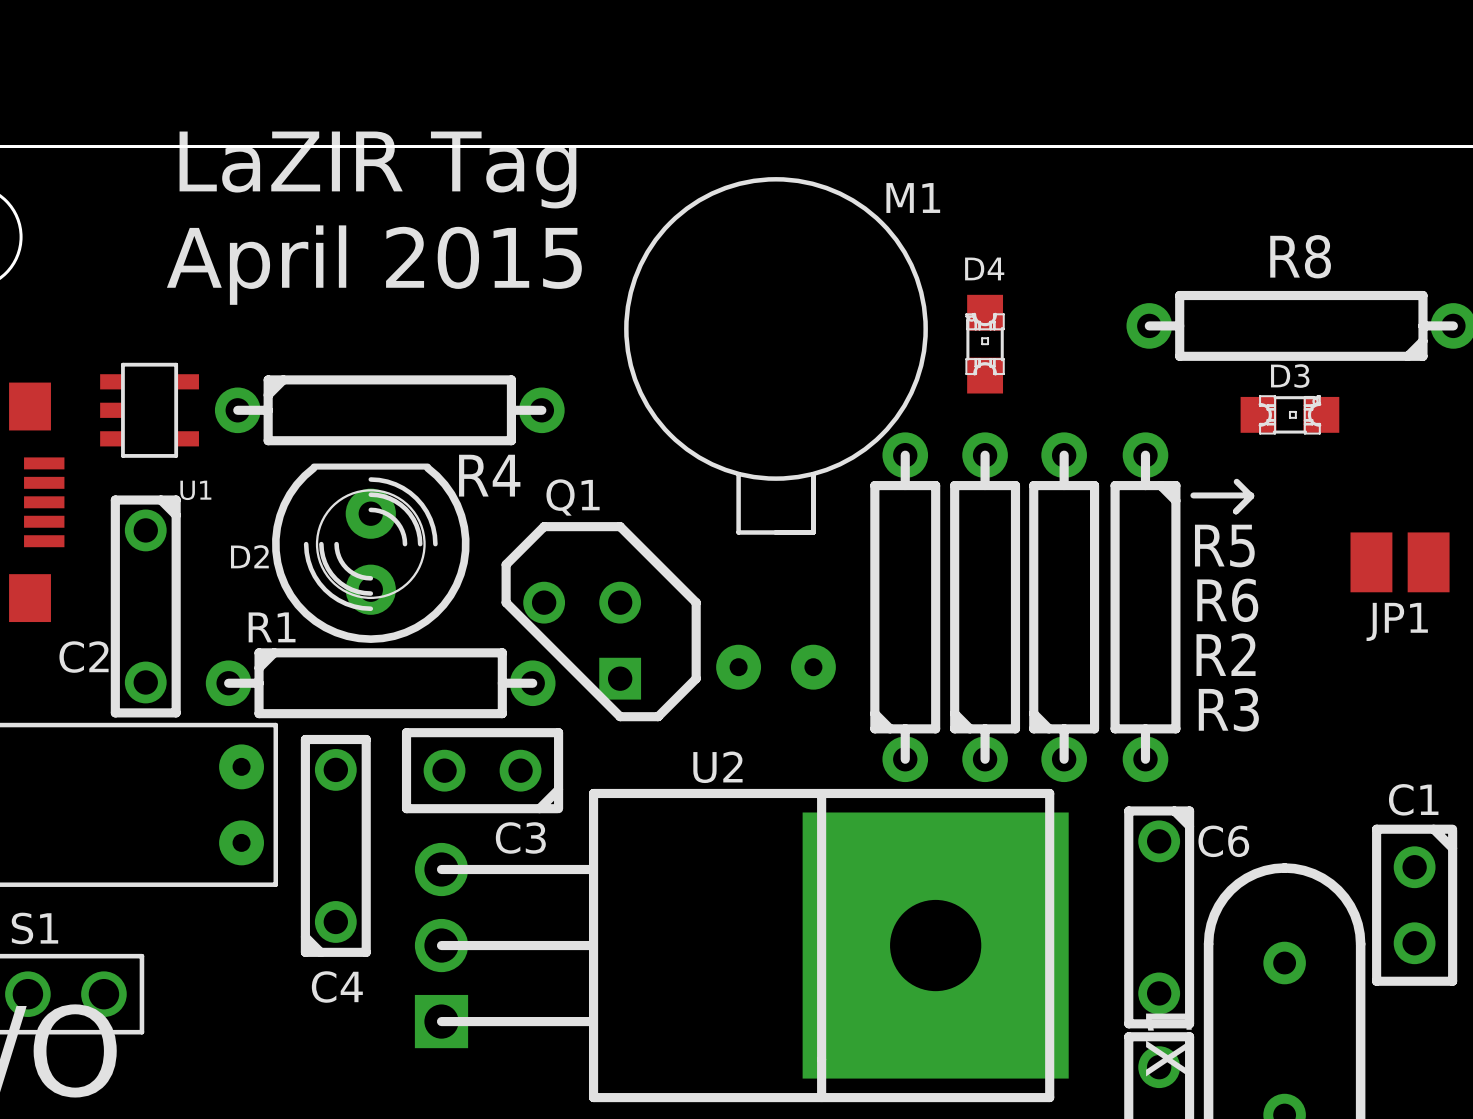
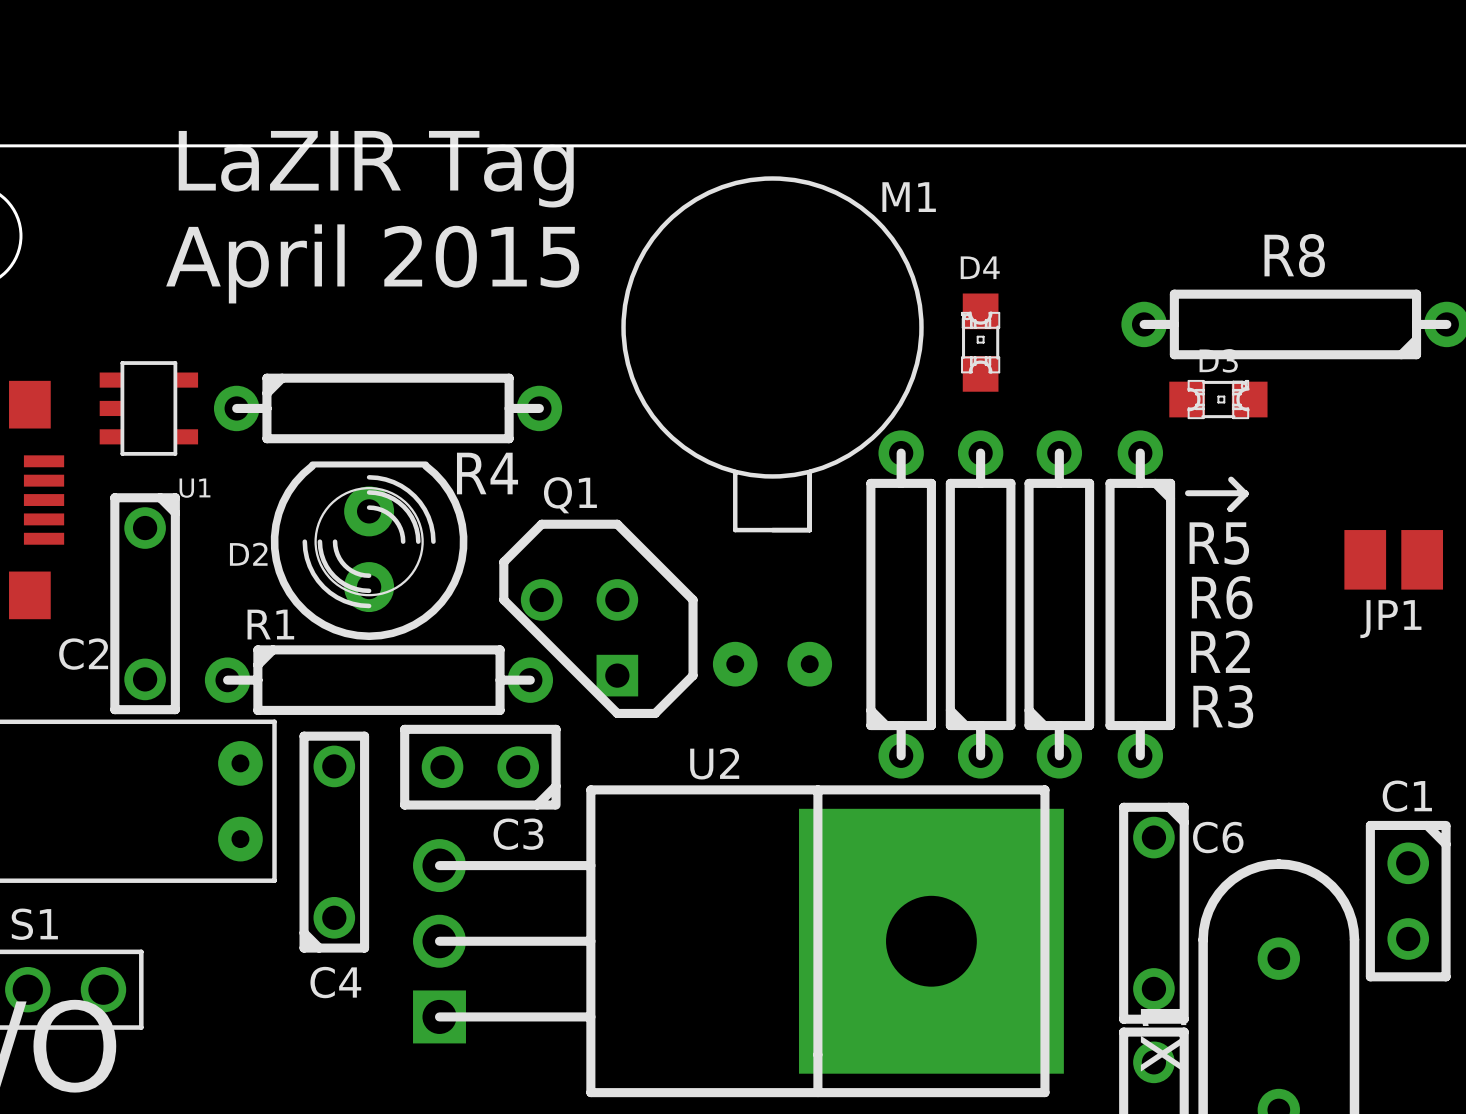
D3 position: (1289, 414) -> (1218, 399)

